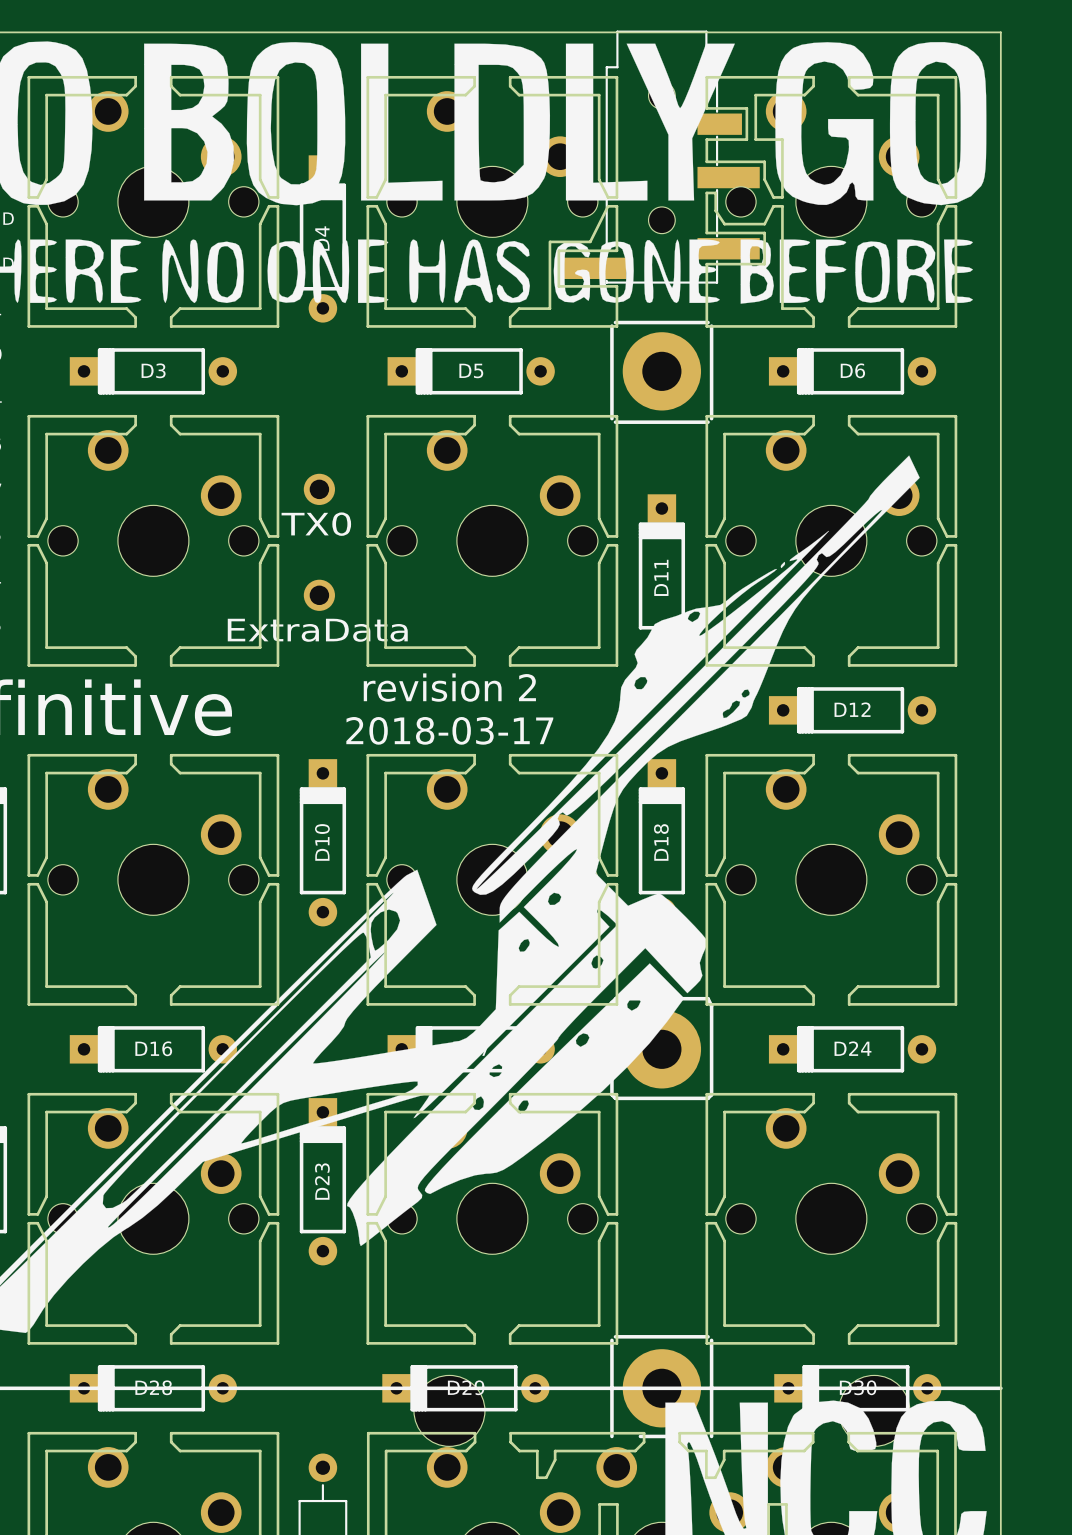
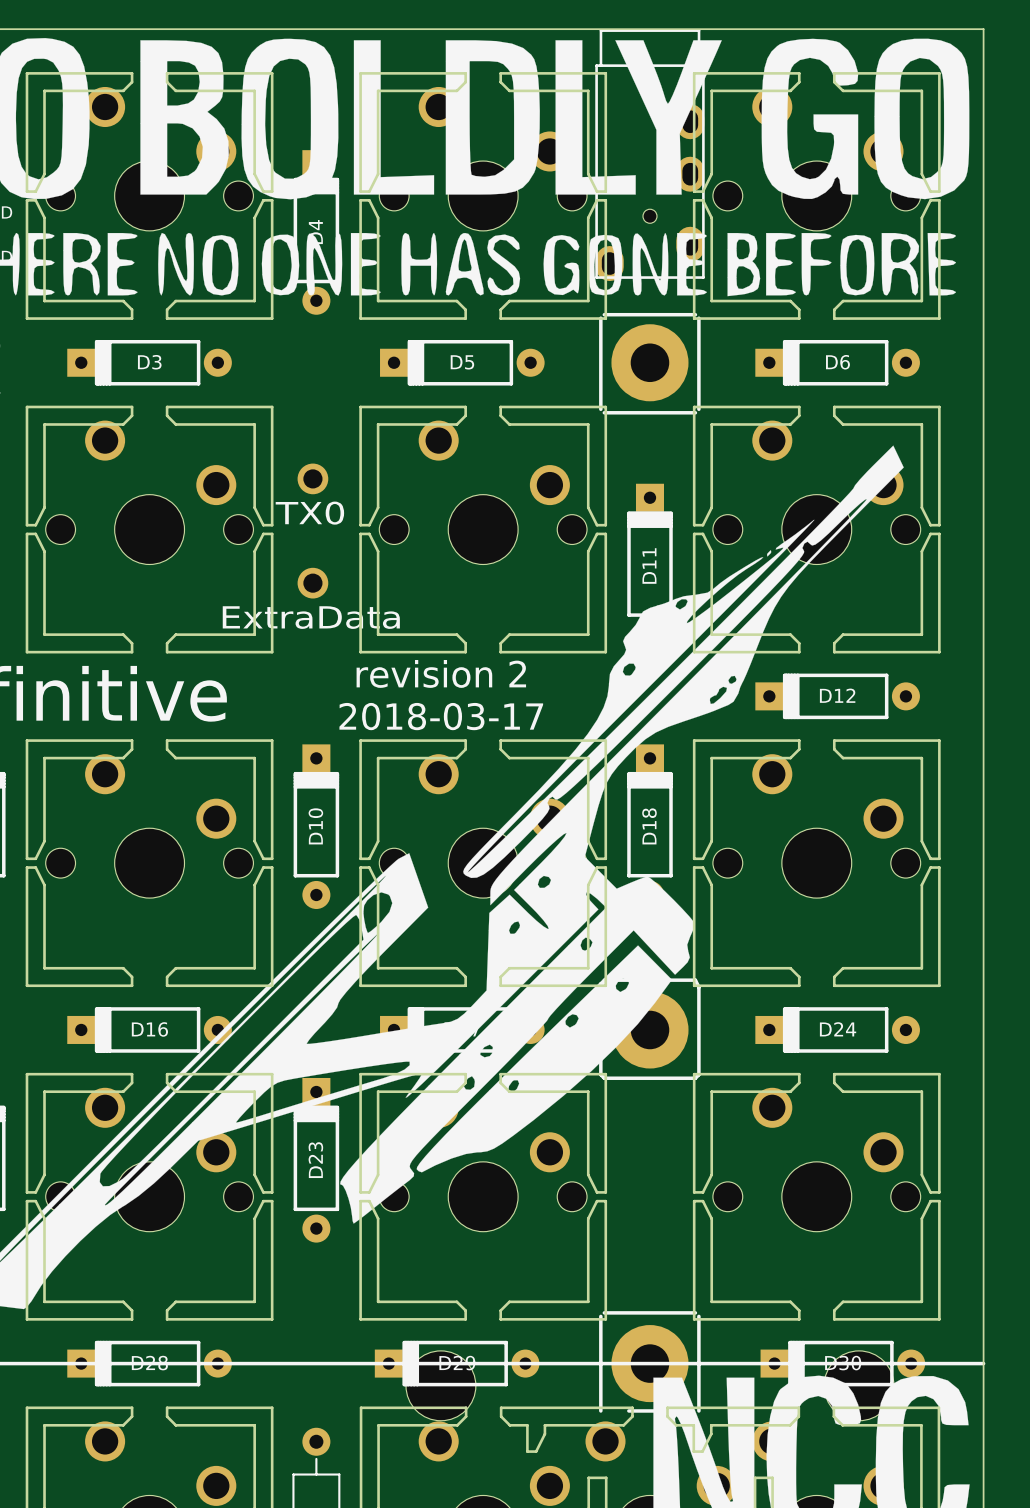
part footprint: [564, 30, 760, 284] -> [595, 29, 705, 282]
part footprint: [366, 75, 619, 328] -> [359, 72, 608, 320]
part footprint: [705, 75, 958, 328] -> [692, 72, 941, 320]

